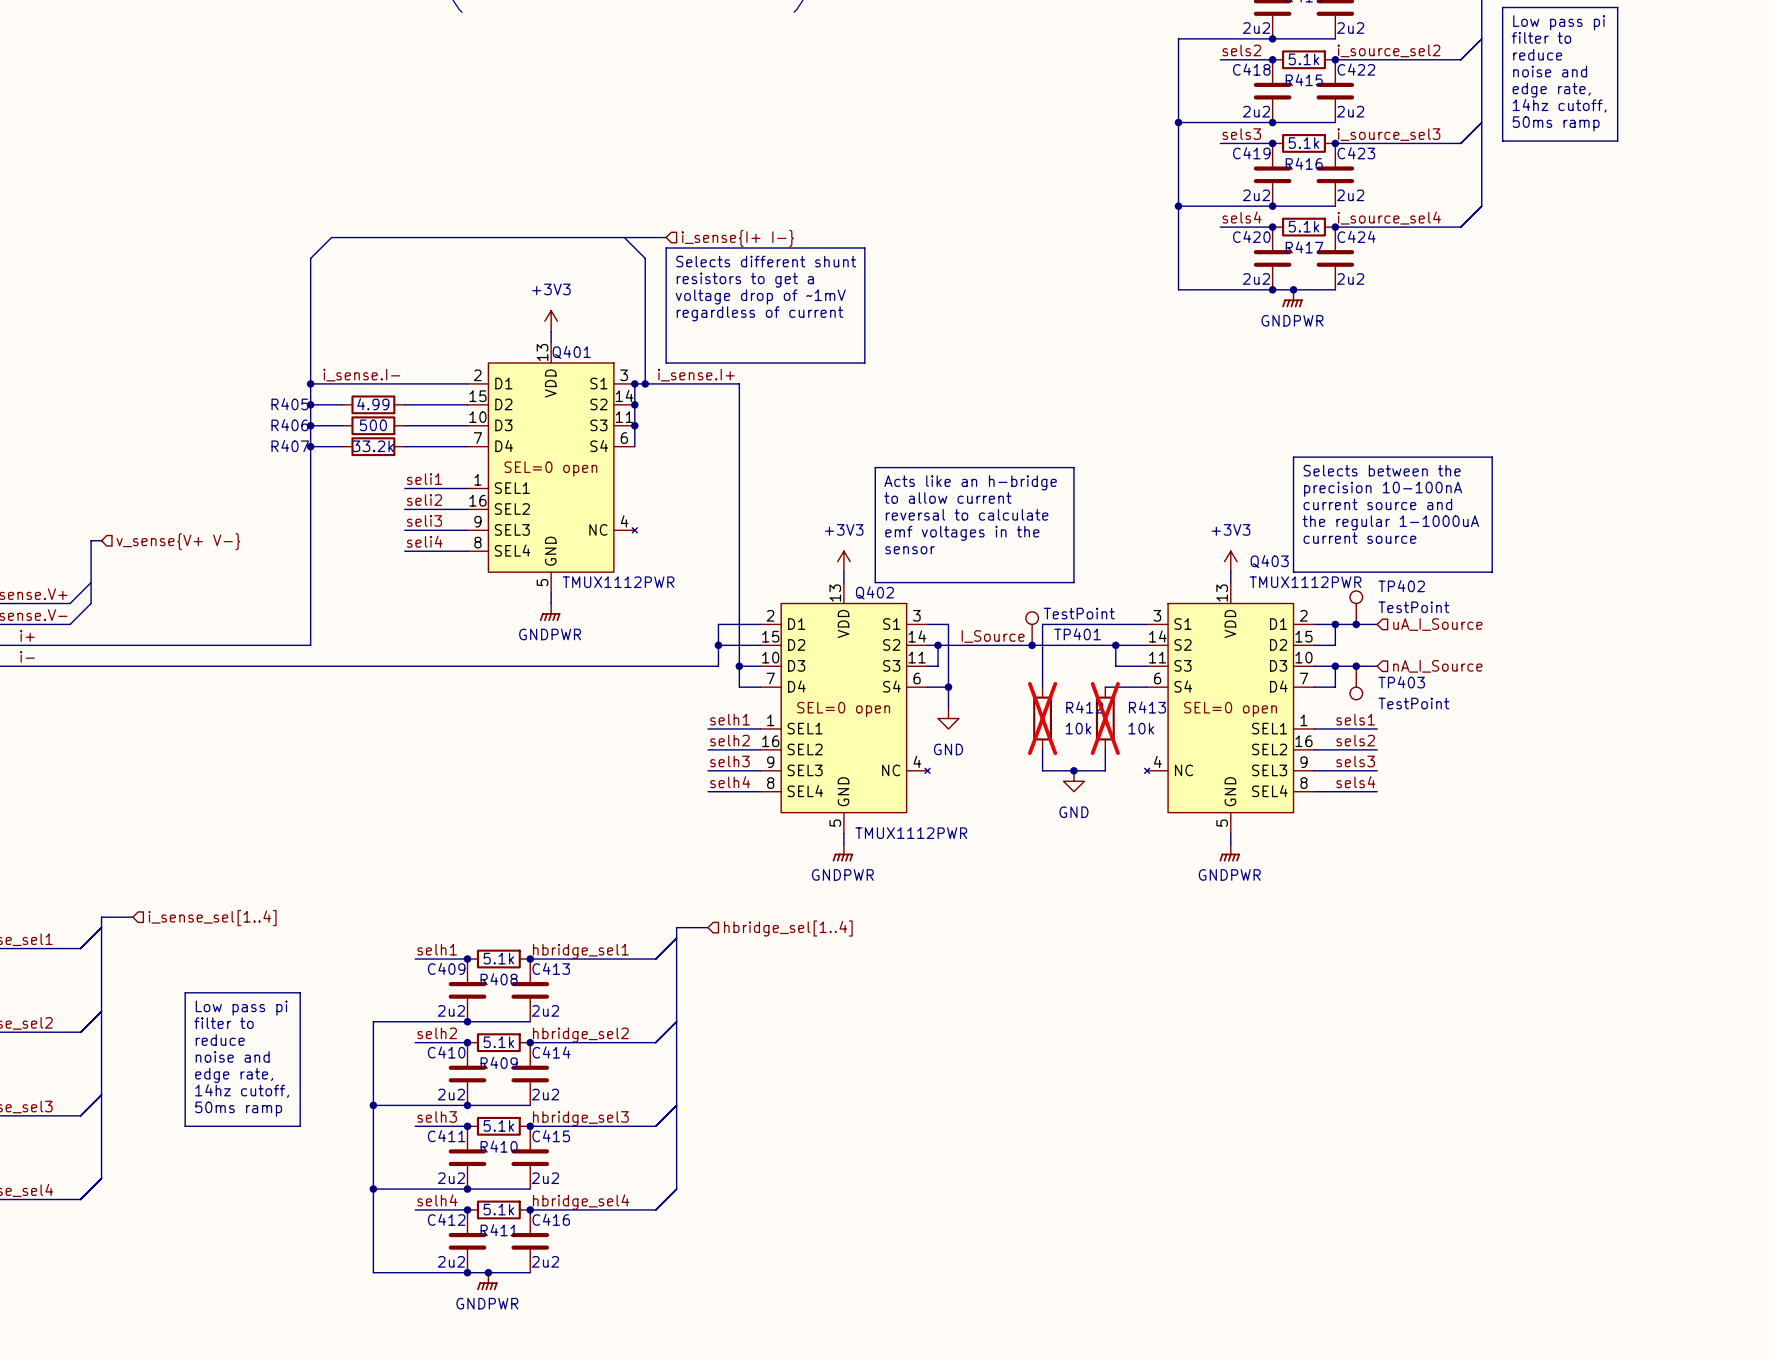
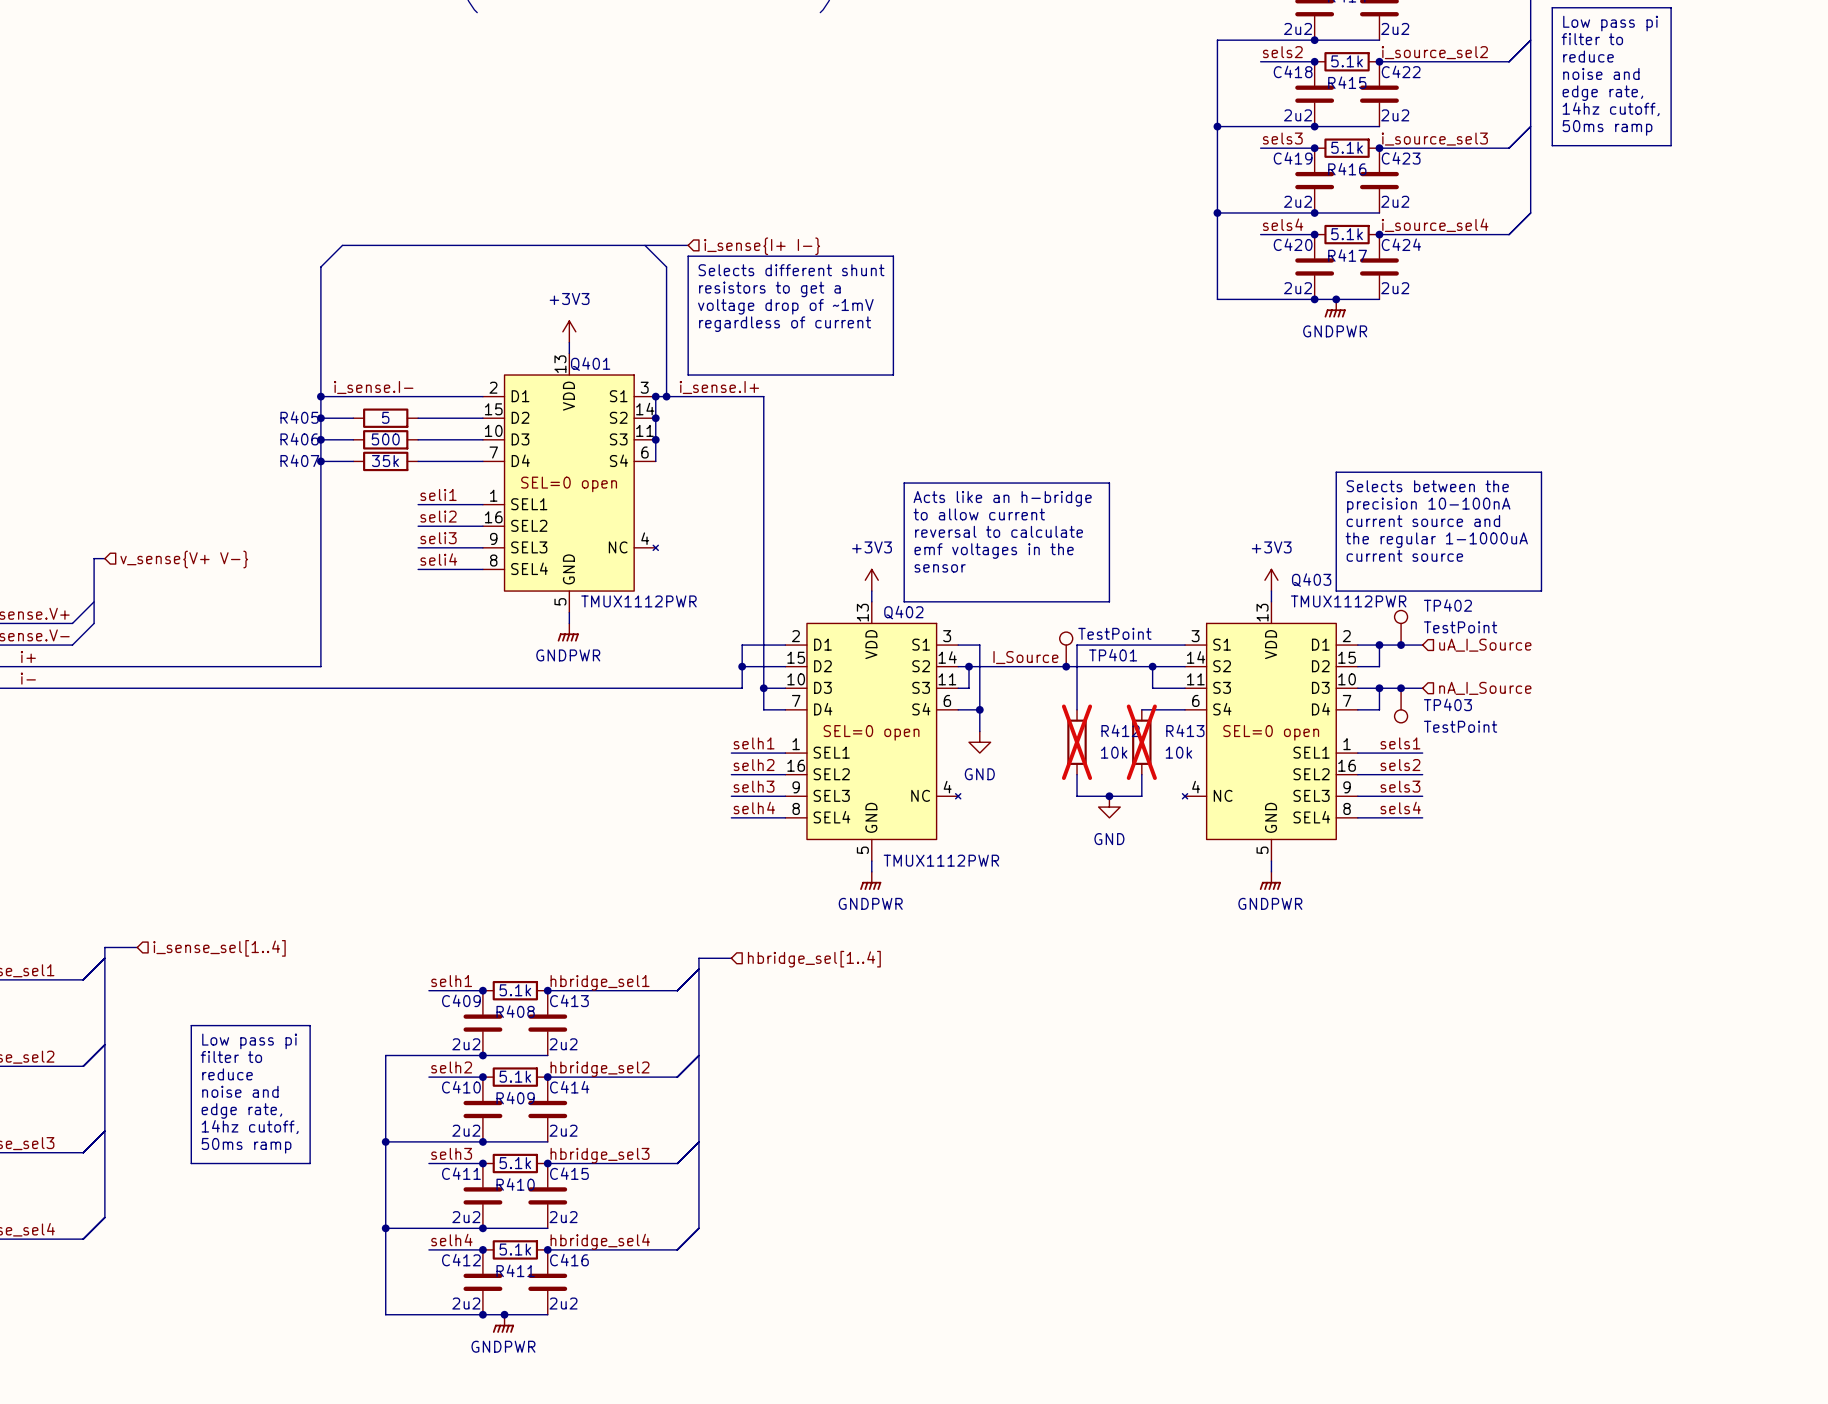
R405 value: 4.99 (373, 404) -> 5 (385, 417)
R407 value: 33.2k (373, 446) -> 35k (385, 461)

